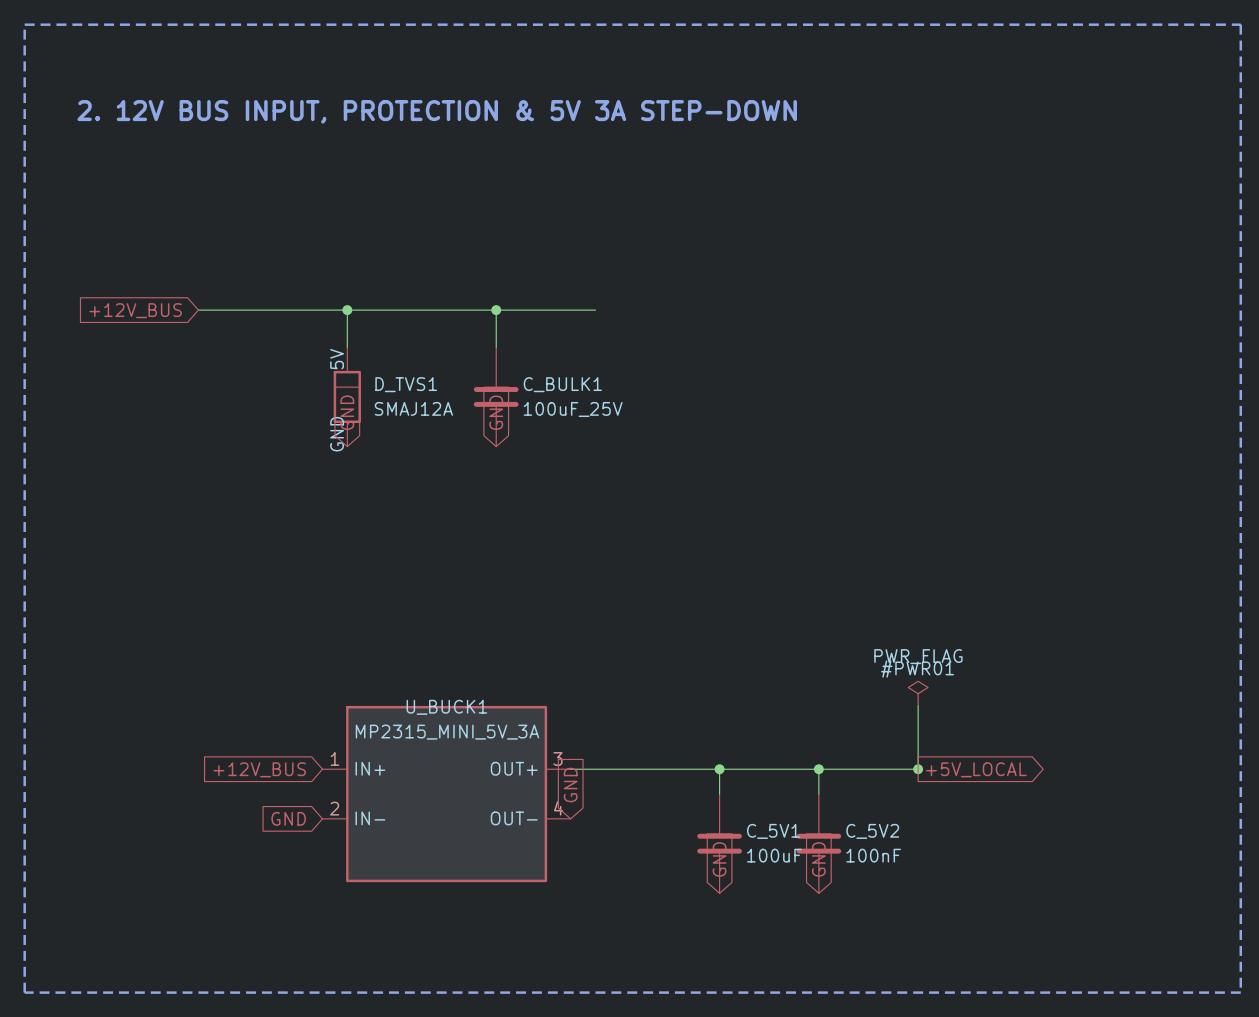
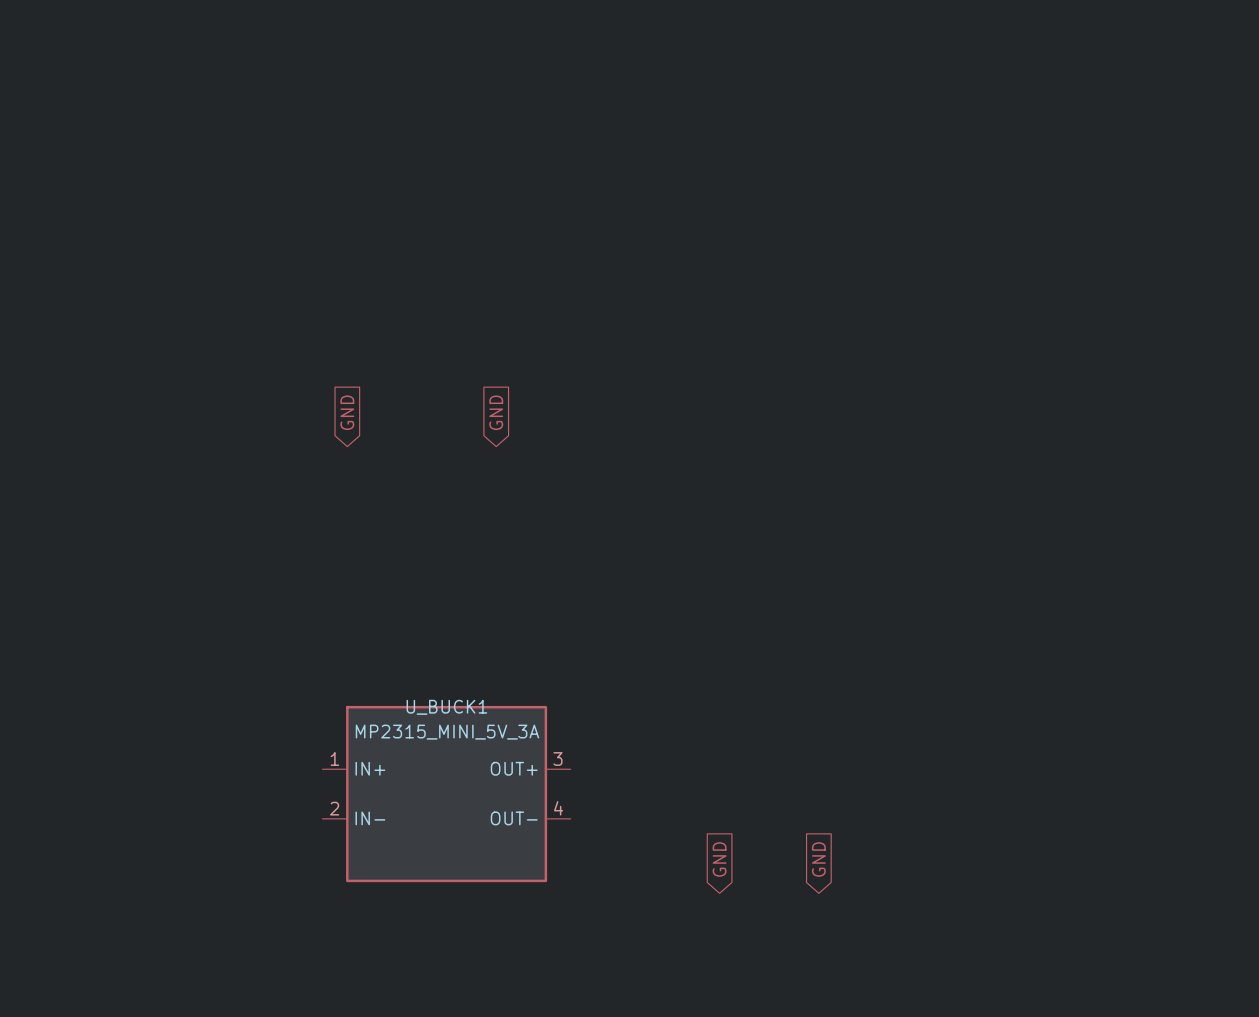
line: (24, 24) (1240, 24) (1240, 992) (24, 992) (24, 24) -> none
text: 2. 12V BUS INPUT, PROTECTION & 5V 3A STEP-DOWN (437, 111) -> none
global label: +12V_BUS (135, 310) -> none
wire: (198, 310) (595, 310) -> none
wire: (347, 310) (347, 347) -> none
junction: (347, 310) -> none
wire: (496, 310) (496, 347) -> none
junction: (496, 310) -> none
D_TVS1: SMAJ12A (347, 396) -> none
C_BULK1: 100uF_25V (496, 396) -> none
#PWR01: PWR_FLAG (918, 693) -> none
wire: (918, 706) (918, 769) (570, 769) -> none
global label: +12V_BUS (259, 769) -> none
wire: (719, 769) (719, 794) -> none
junction: (719, 769) -> none
wire: (818, 769) (818, 794) -> none
junction: (818, 769) -> none
junction: (918, 769) -> none
global label: +5V_LOCAL (976, 769) -> none
global label: GND (570, 785) -> none
global label: GND (288, 818) -> none
C_5V1: 100uF (719, 843) -> none
C_5V2: 100nF (818, 843) -> none

